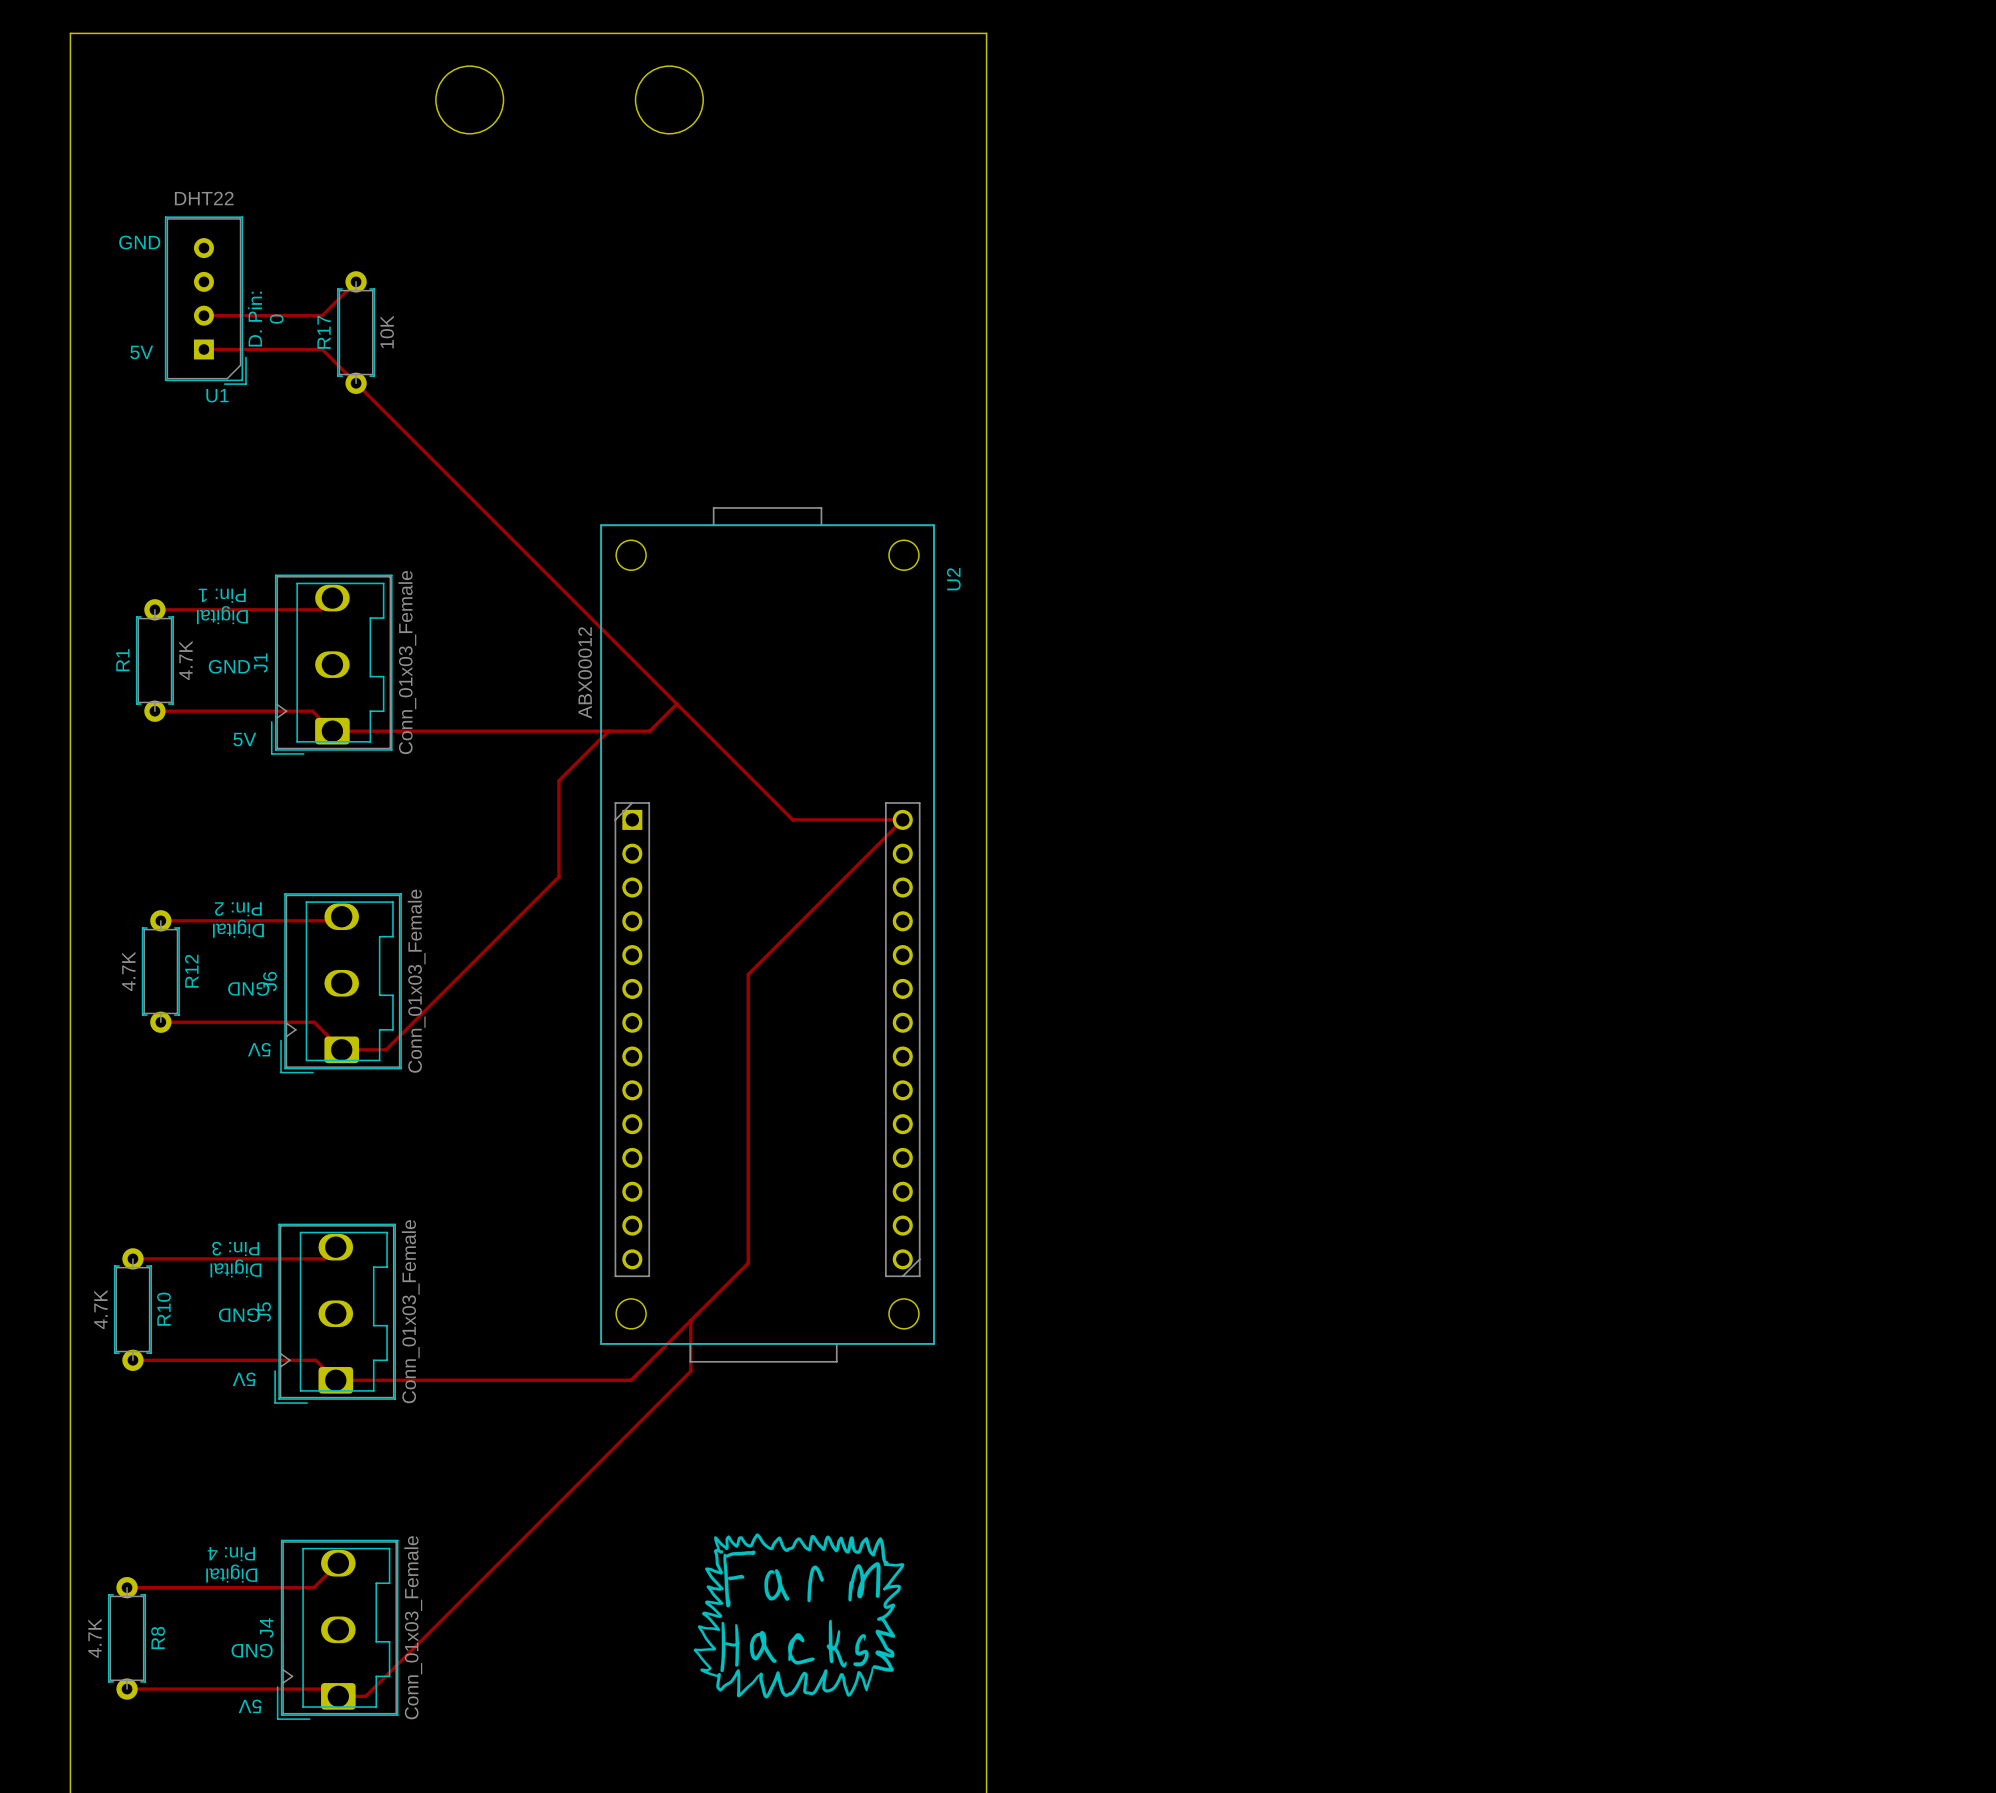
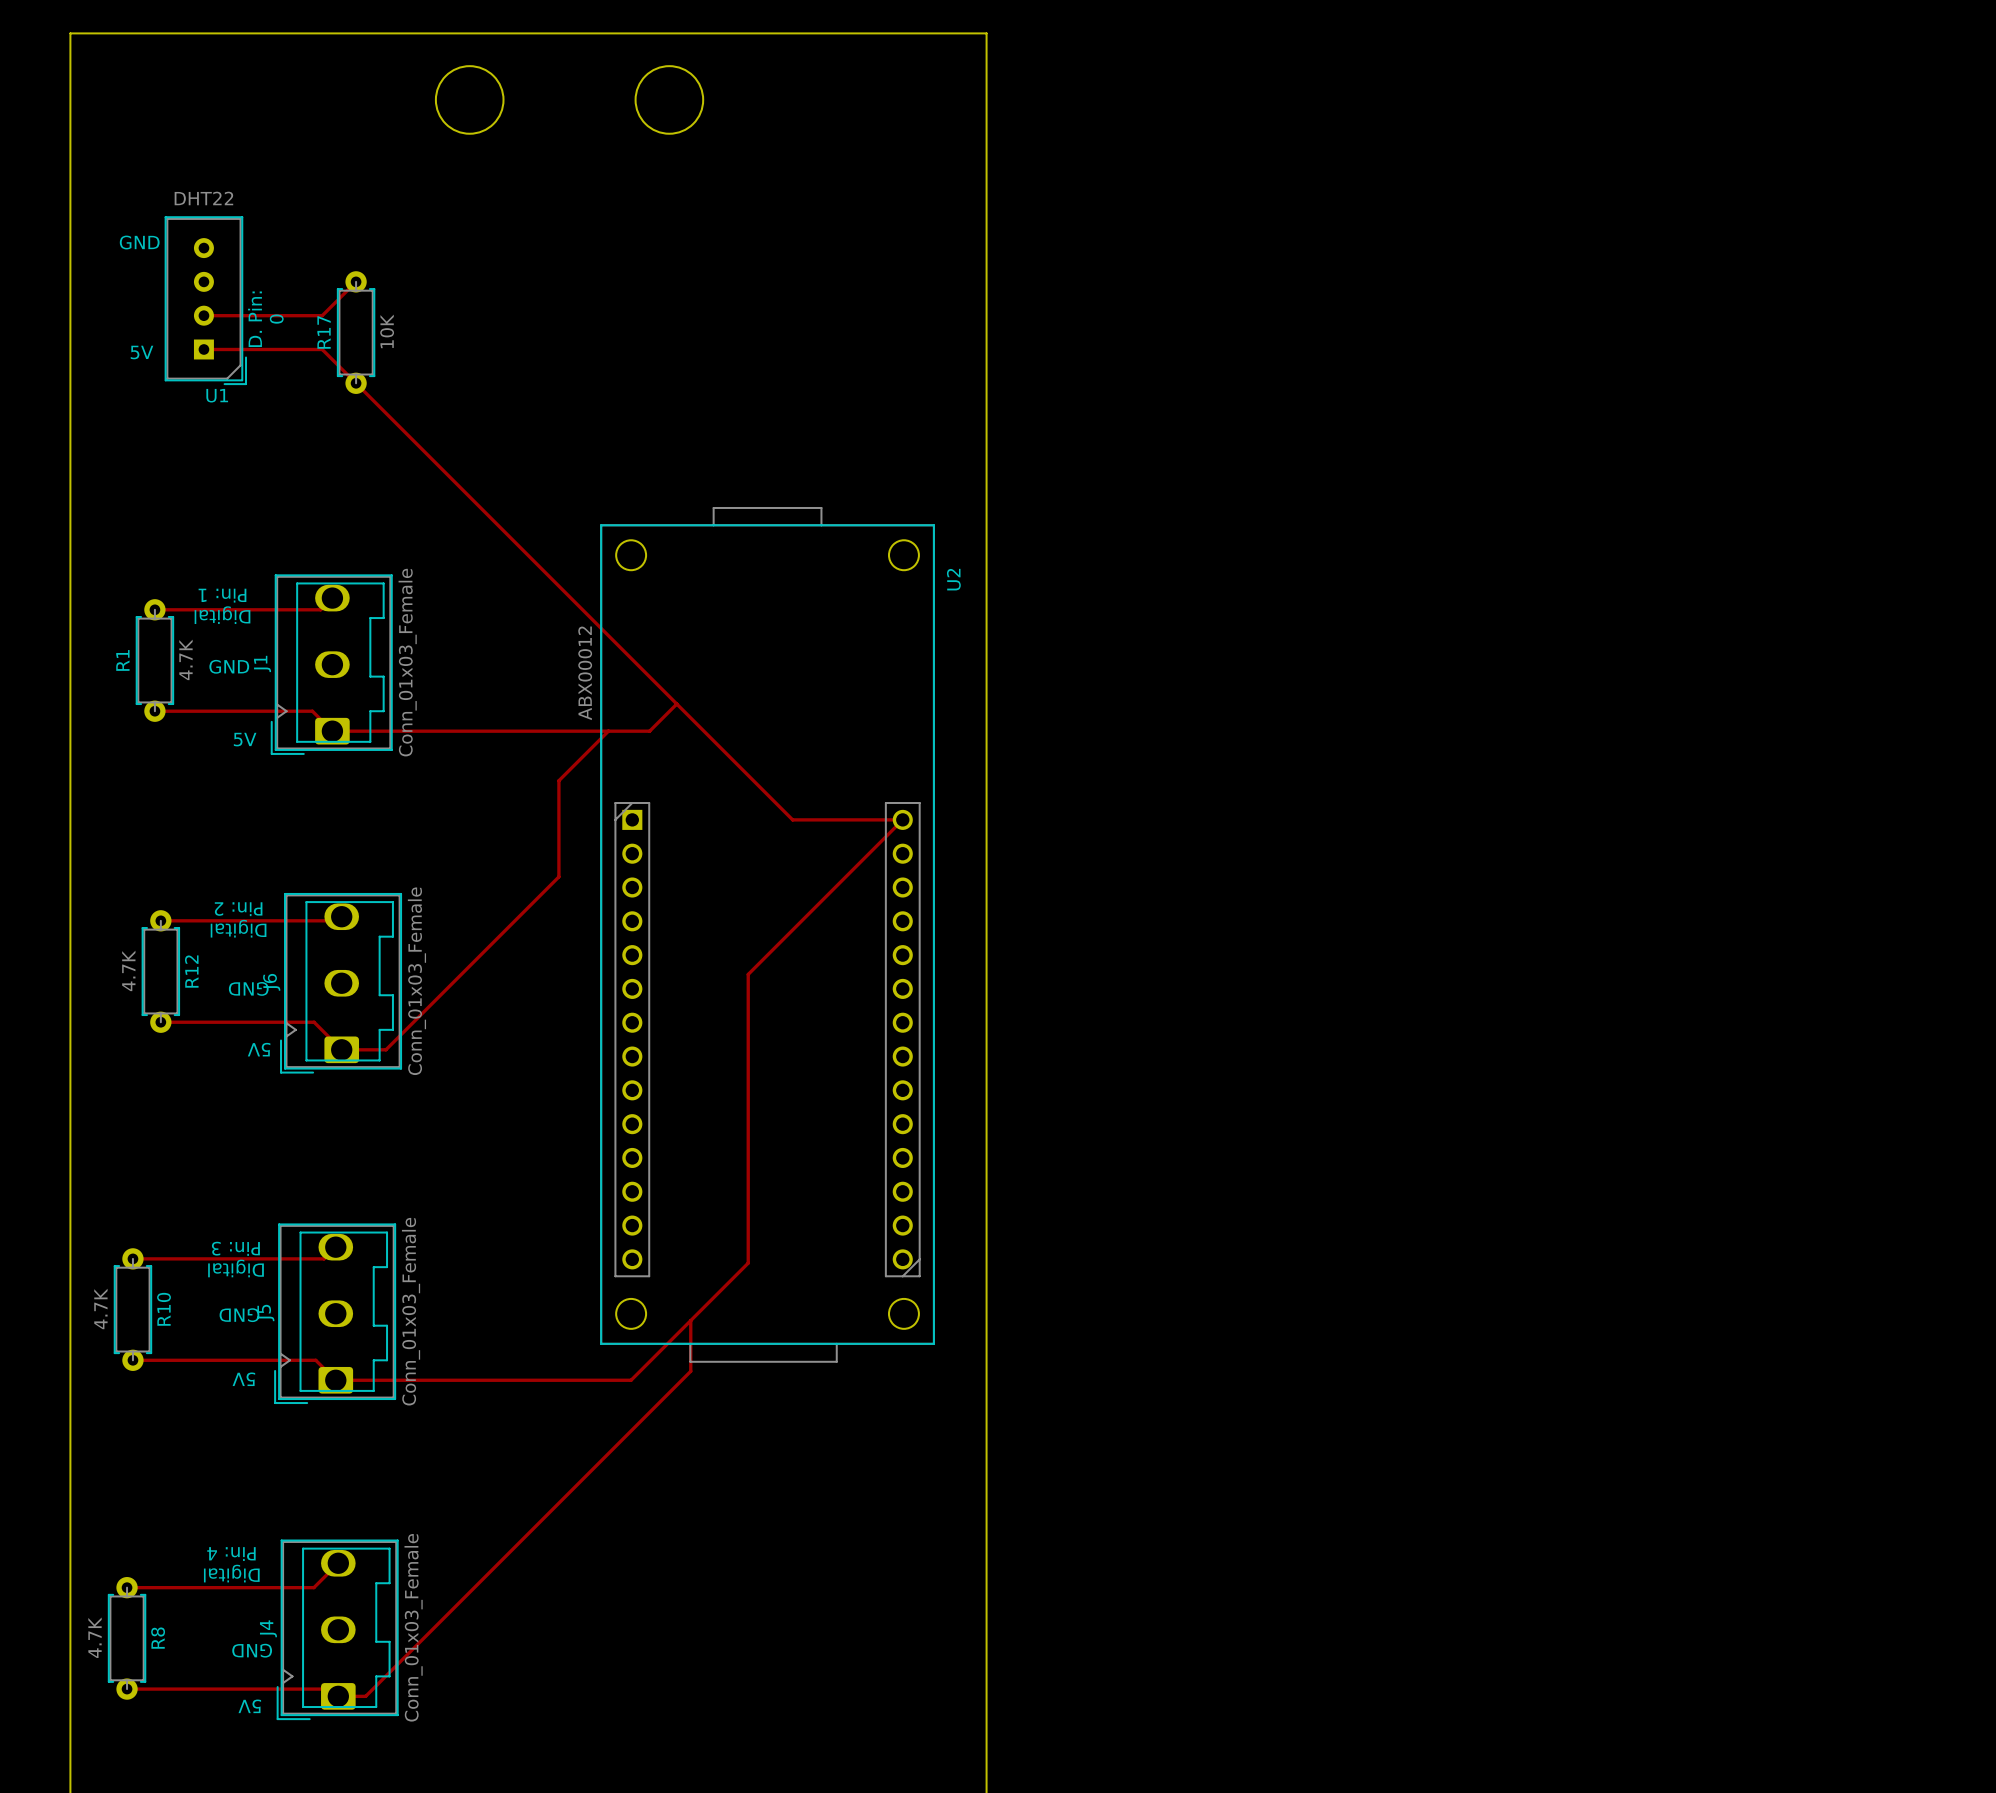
drawing: [693, 1533, 905, 1699] -> none

